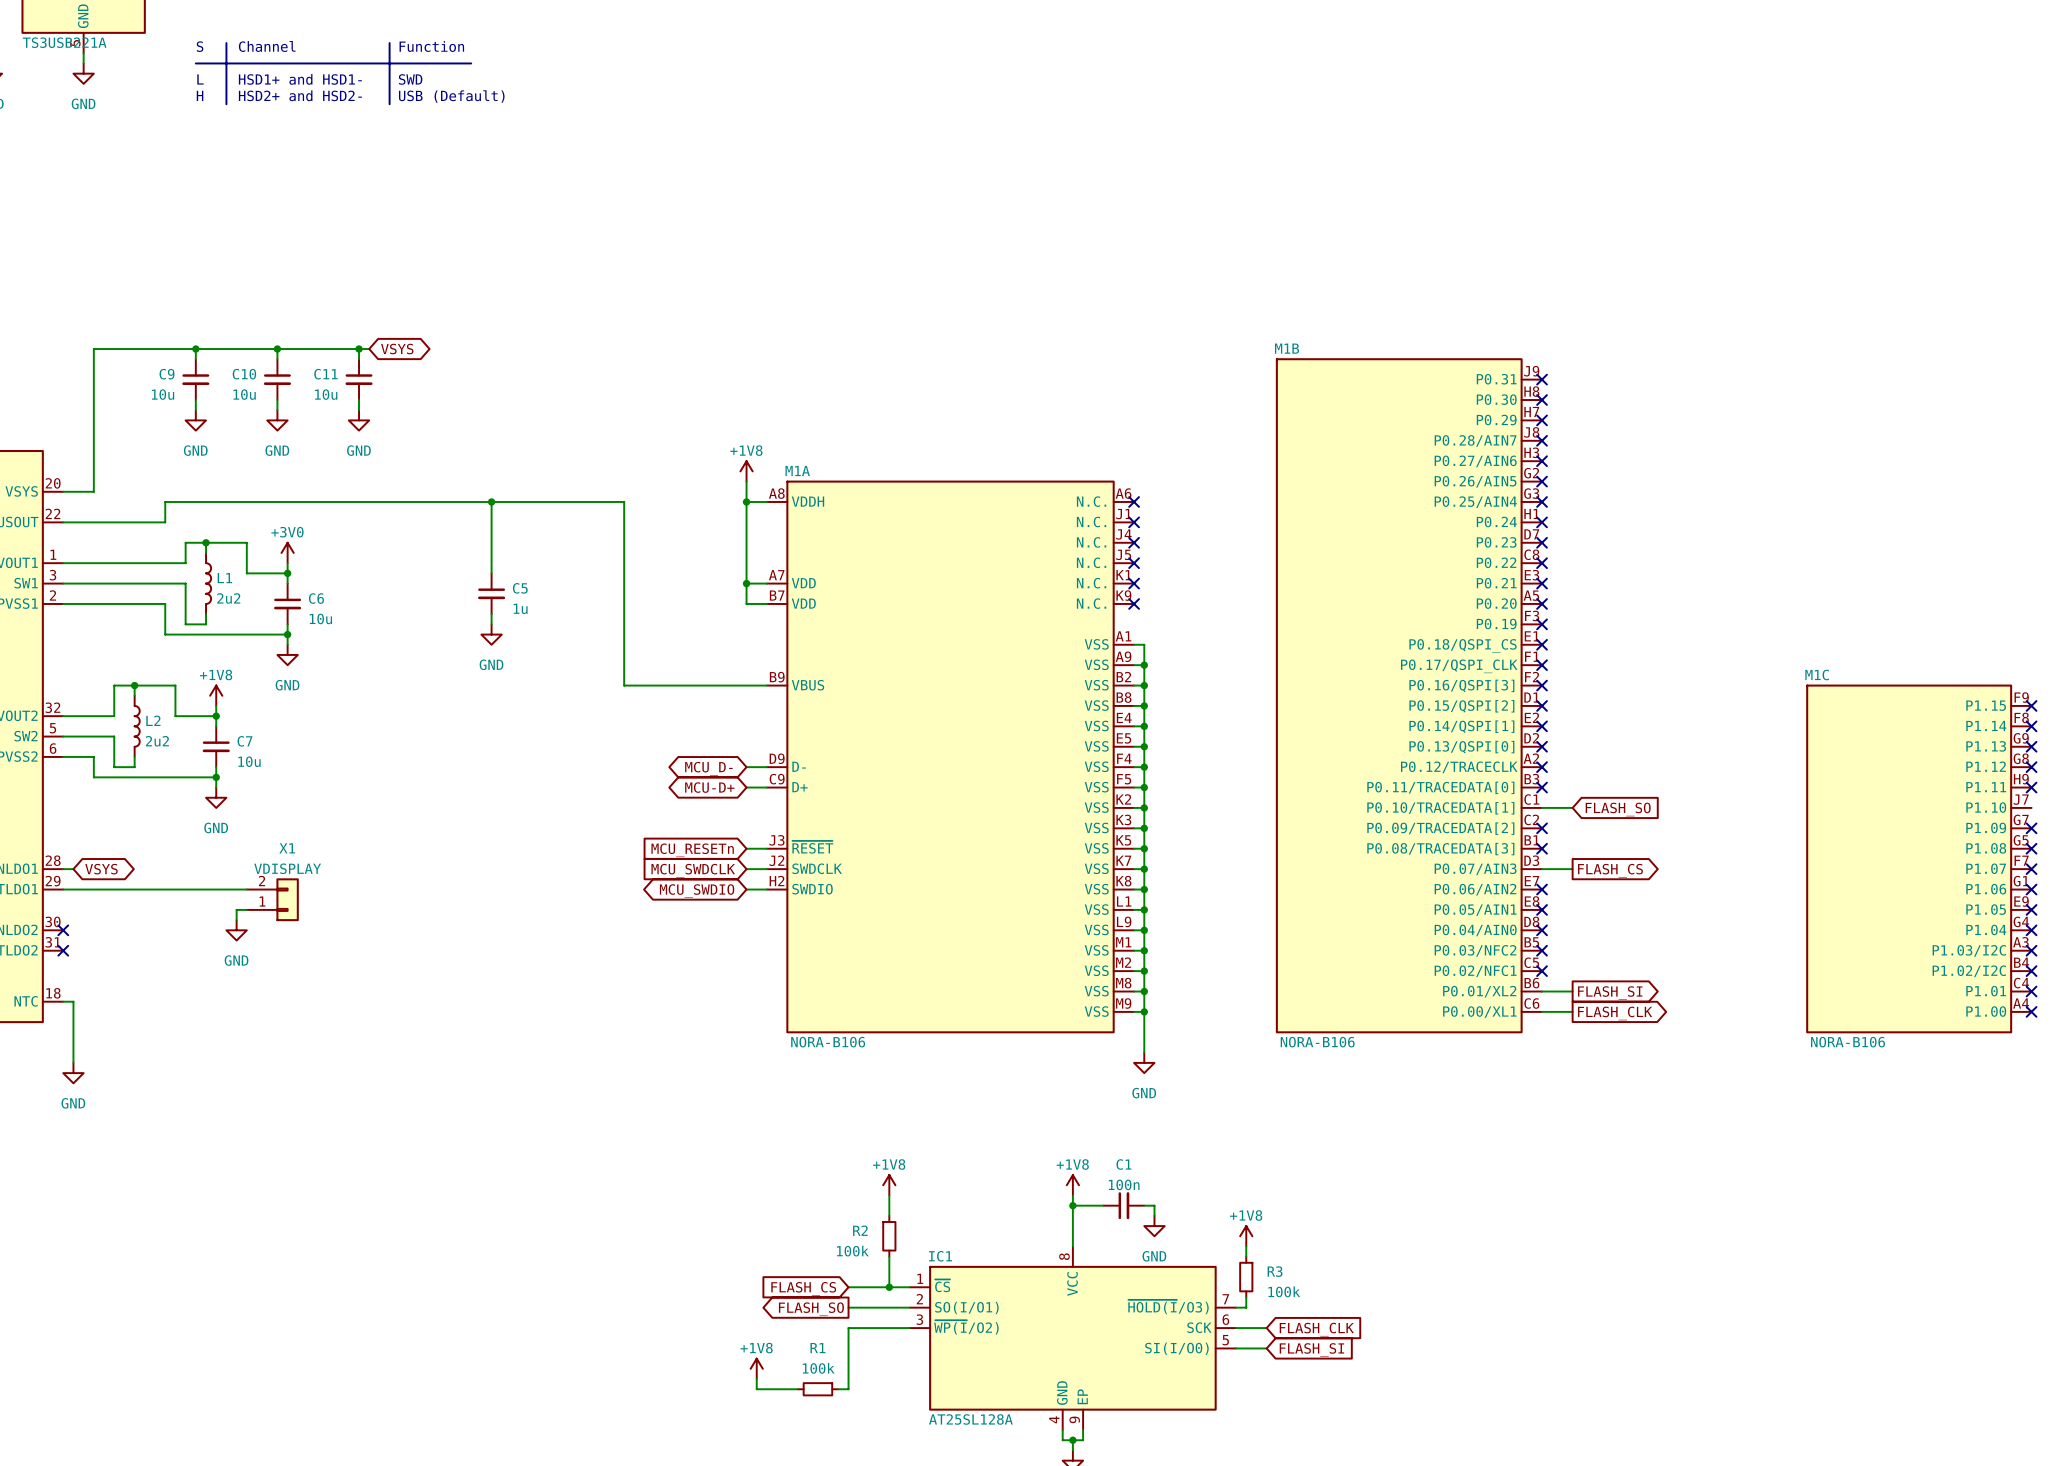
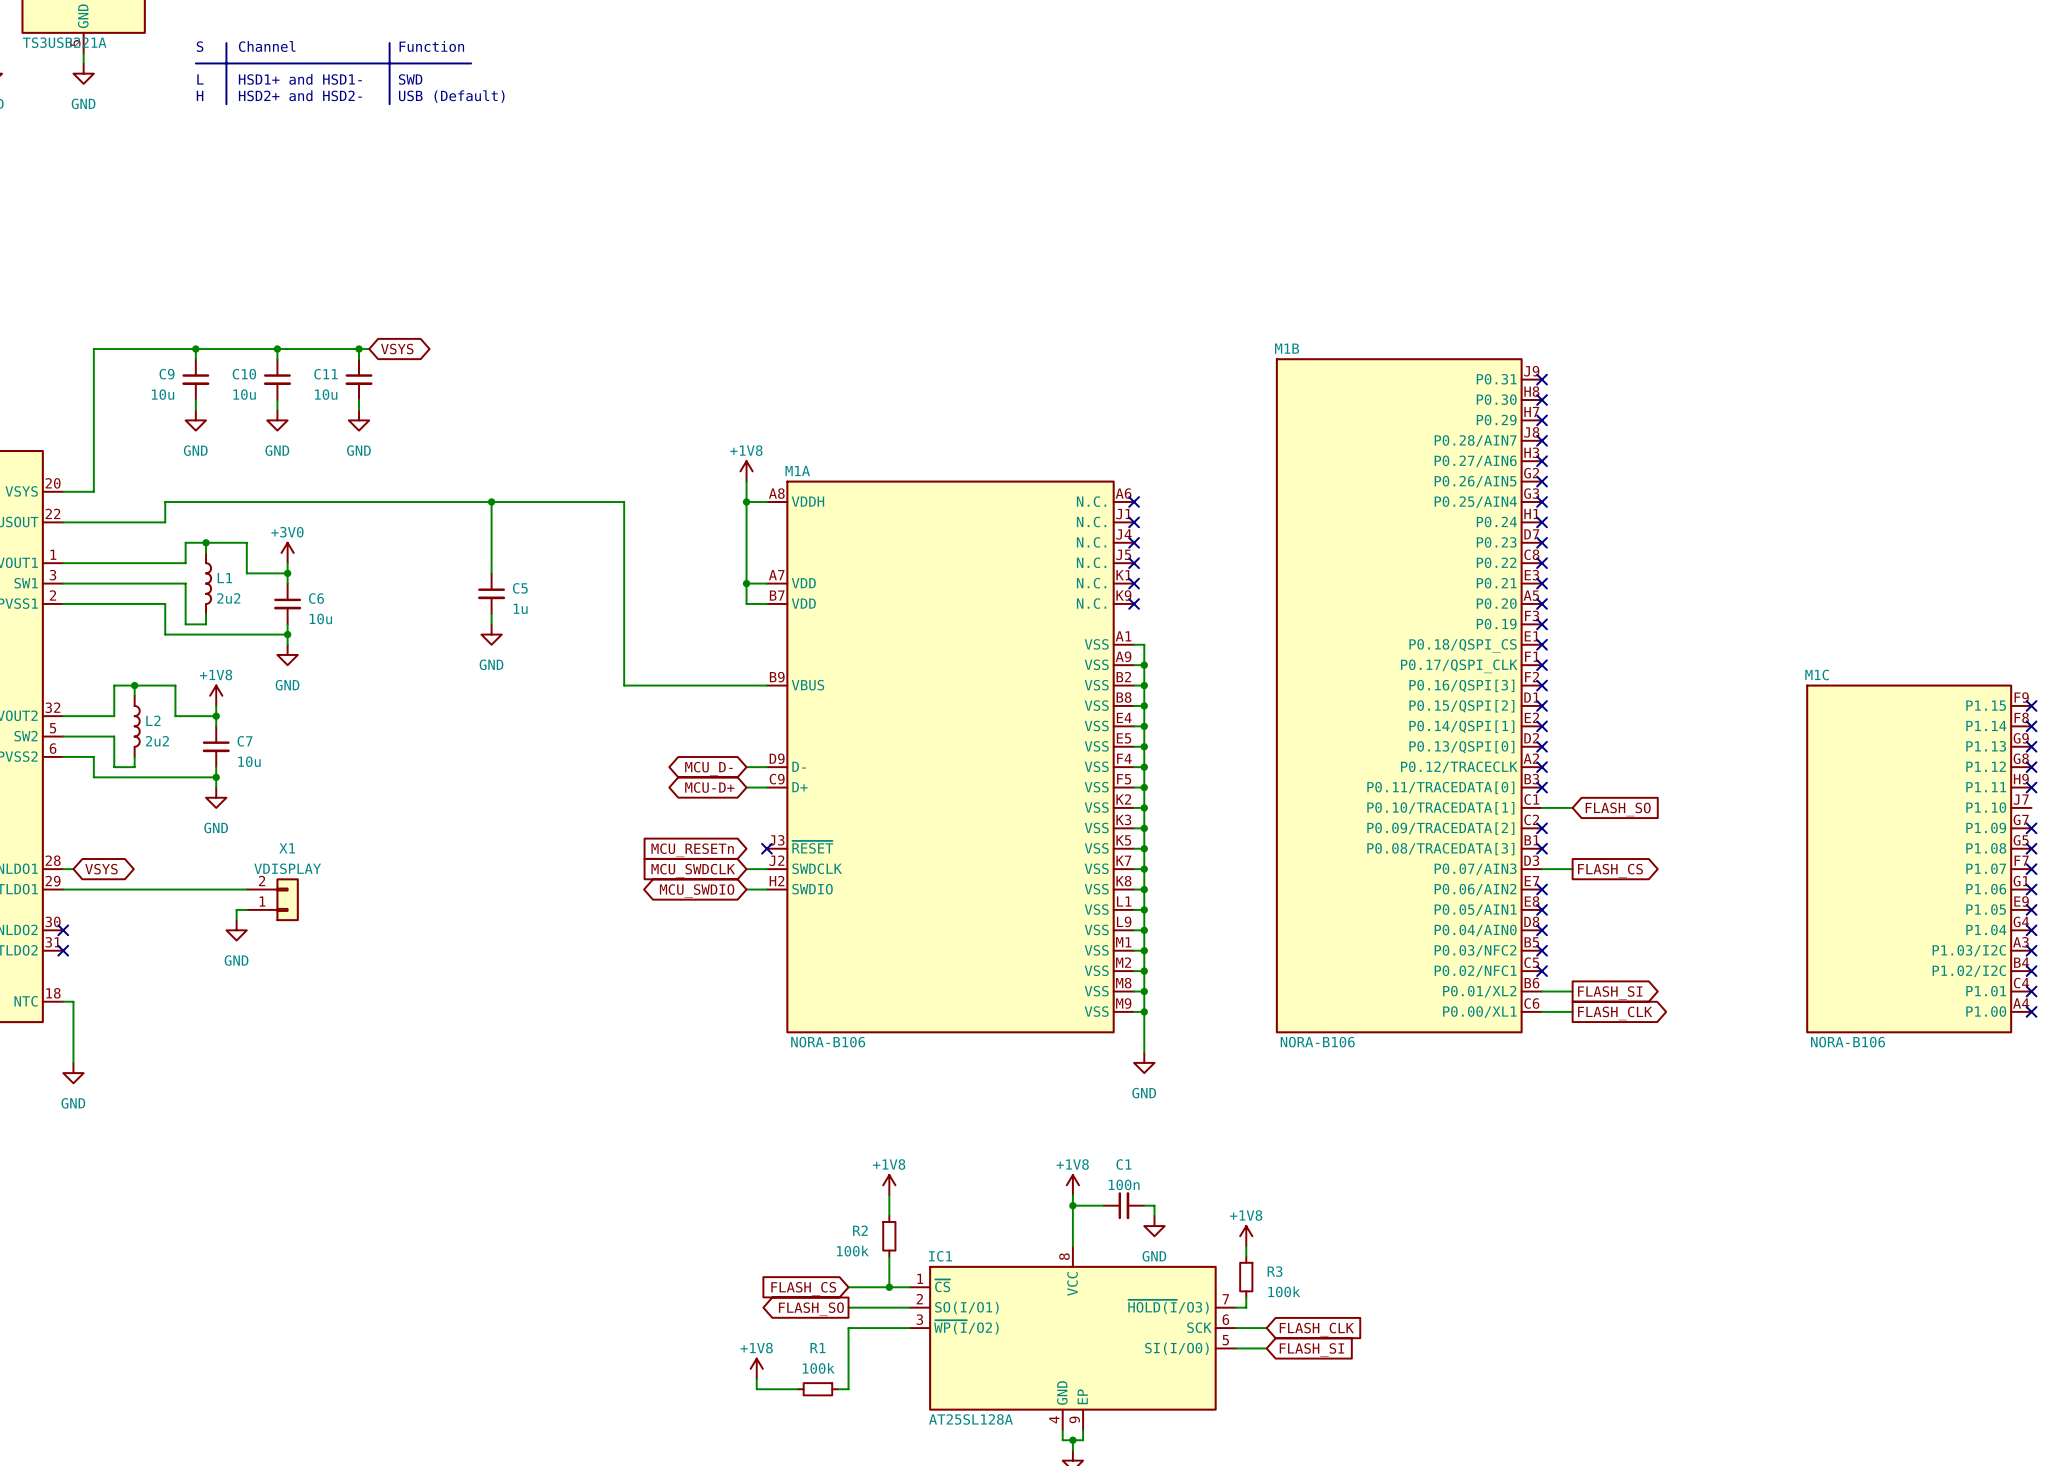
wire: (746, 848) (766, 848) -> none
no-connect mark: none -> (766, 848)

